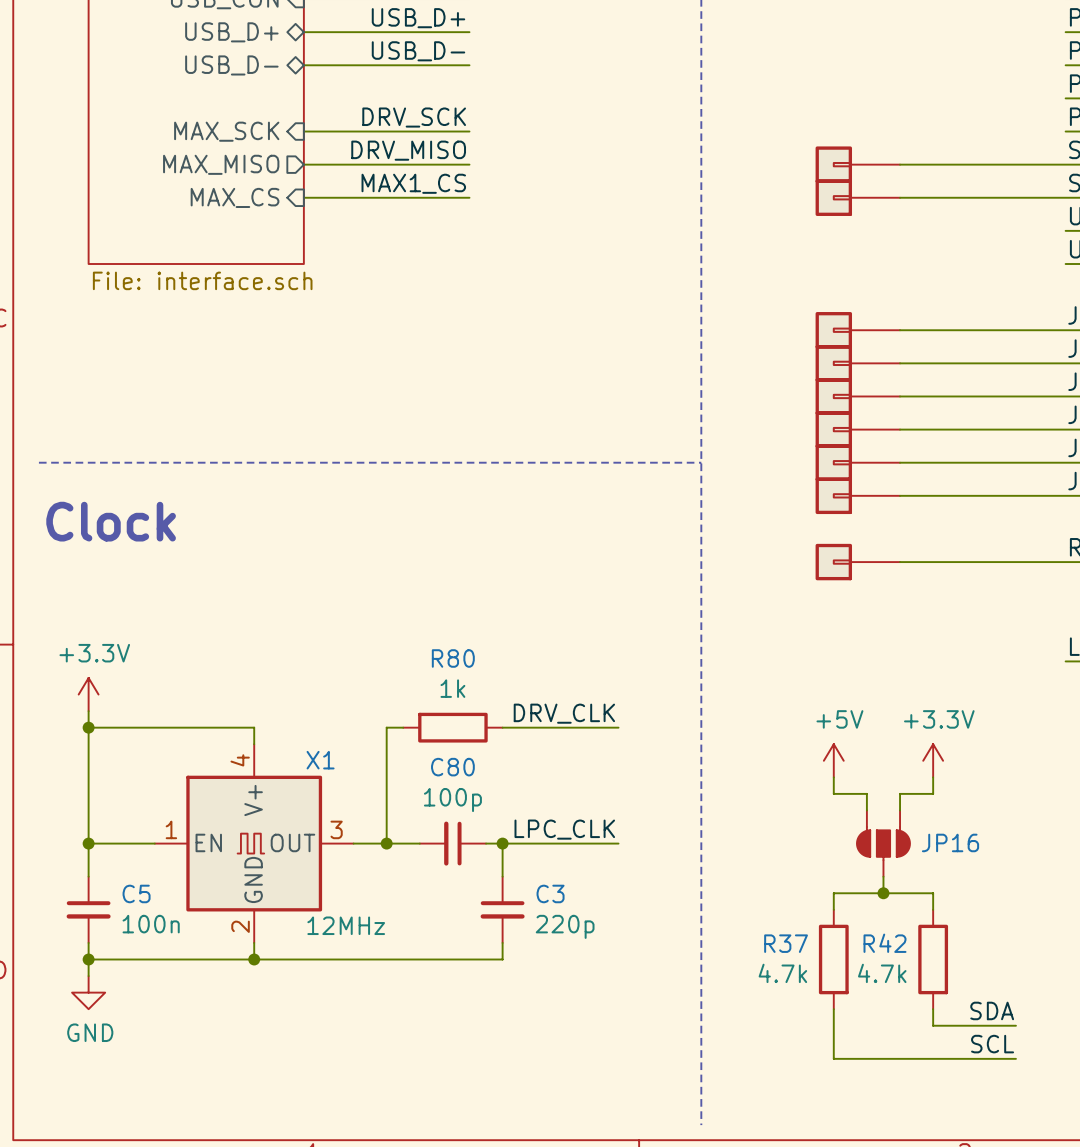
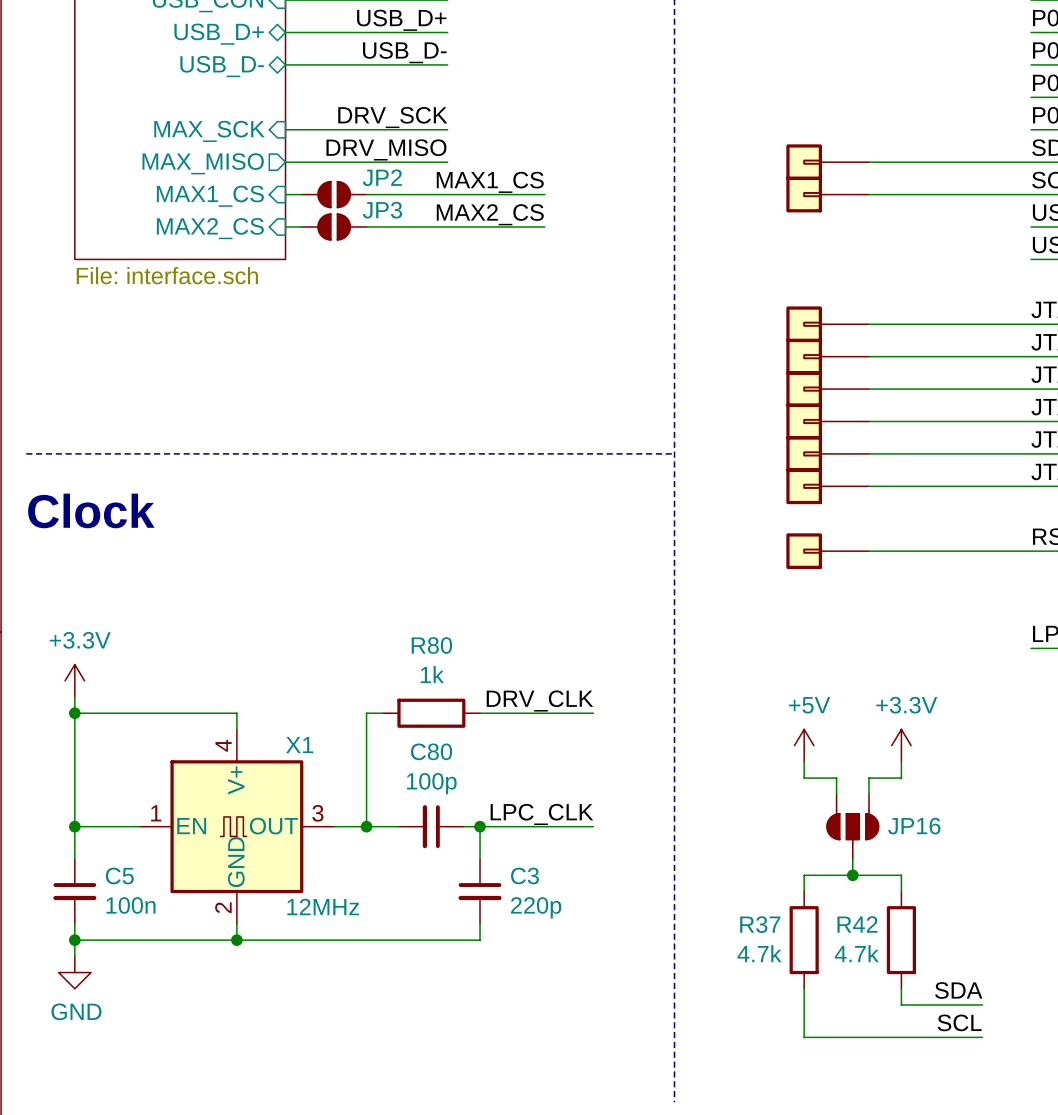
label position: MAX1_CS (413, 183) -> MAX1_CS (490, 182)
sheet pin: MAX_CS (235, 197) -> MAX1_CS (210, 196)
JP2: none -> (334, 194)
wire: none -> (447, 194) (544, 194)
label: none -> MAX2_CS (490, 214)
wire: none -> (285, 227) (301, 227)
JP3: none -> (334, 227)
wire: none -> (366, 227) (544, 227)
sheet pin: none -> MAX2_CS (210, 228)

